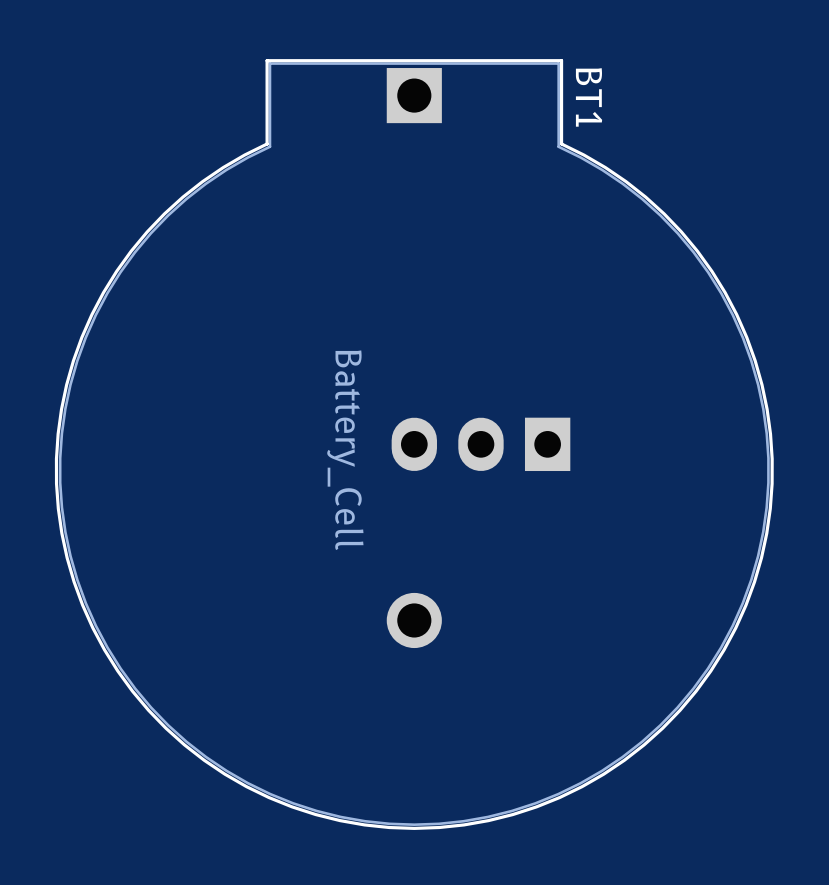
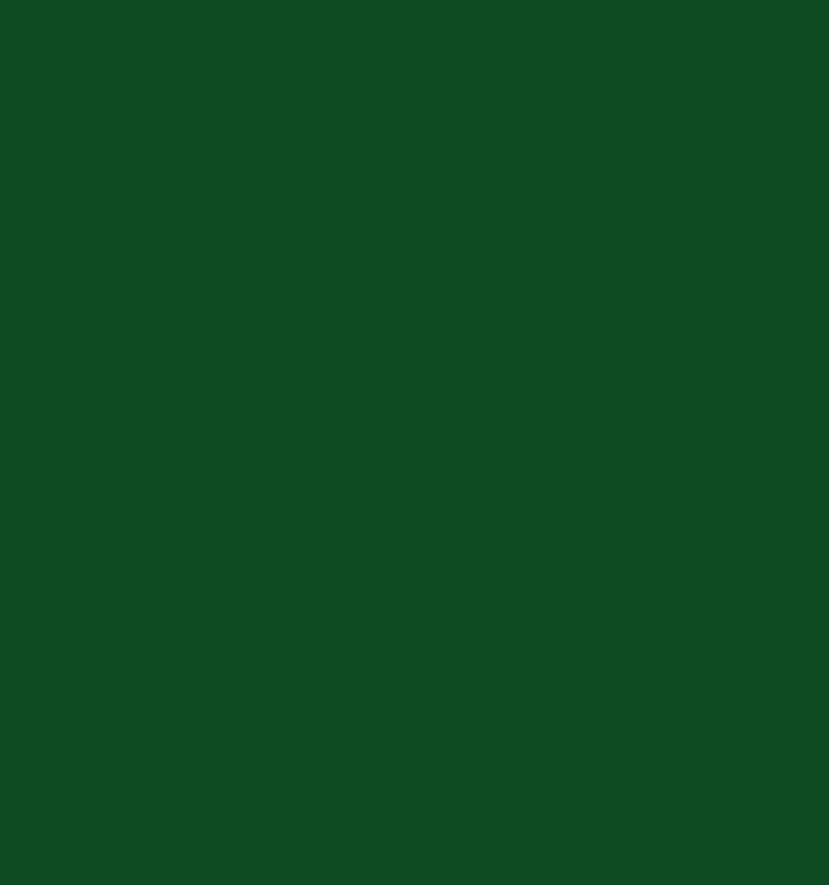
BT1: Battery_Cell (414, 444) -> none
part: (480, 444) -> none

